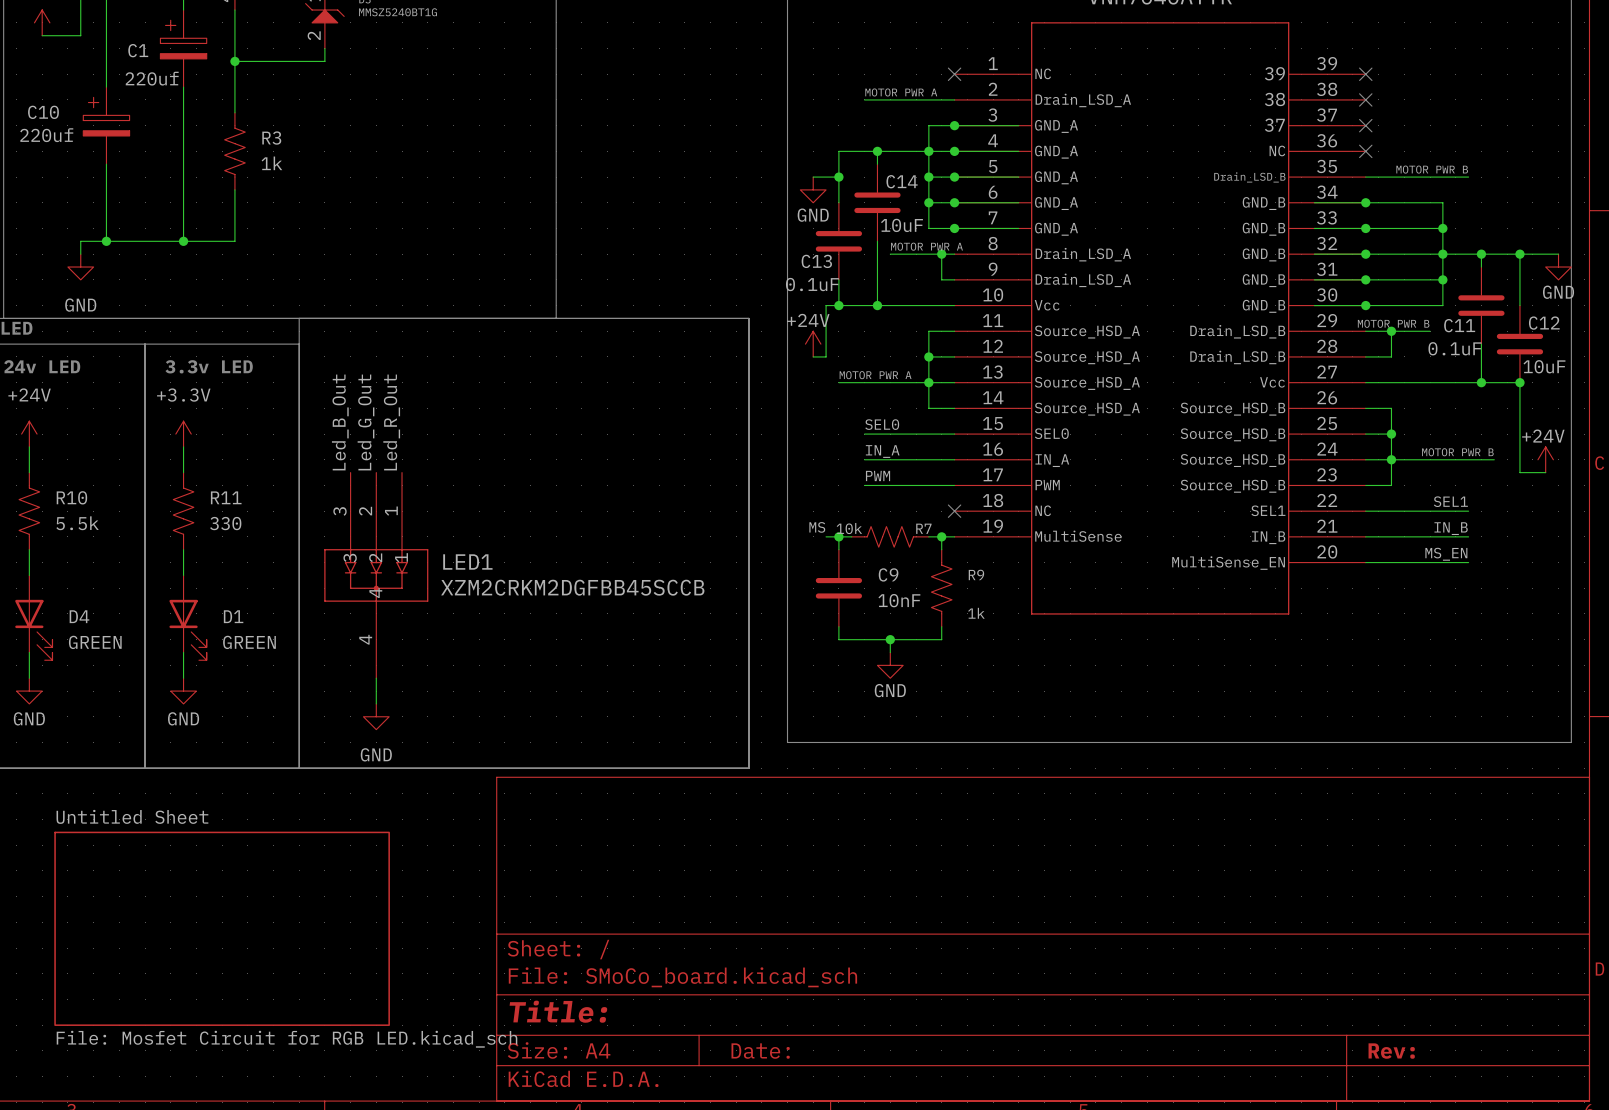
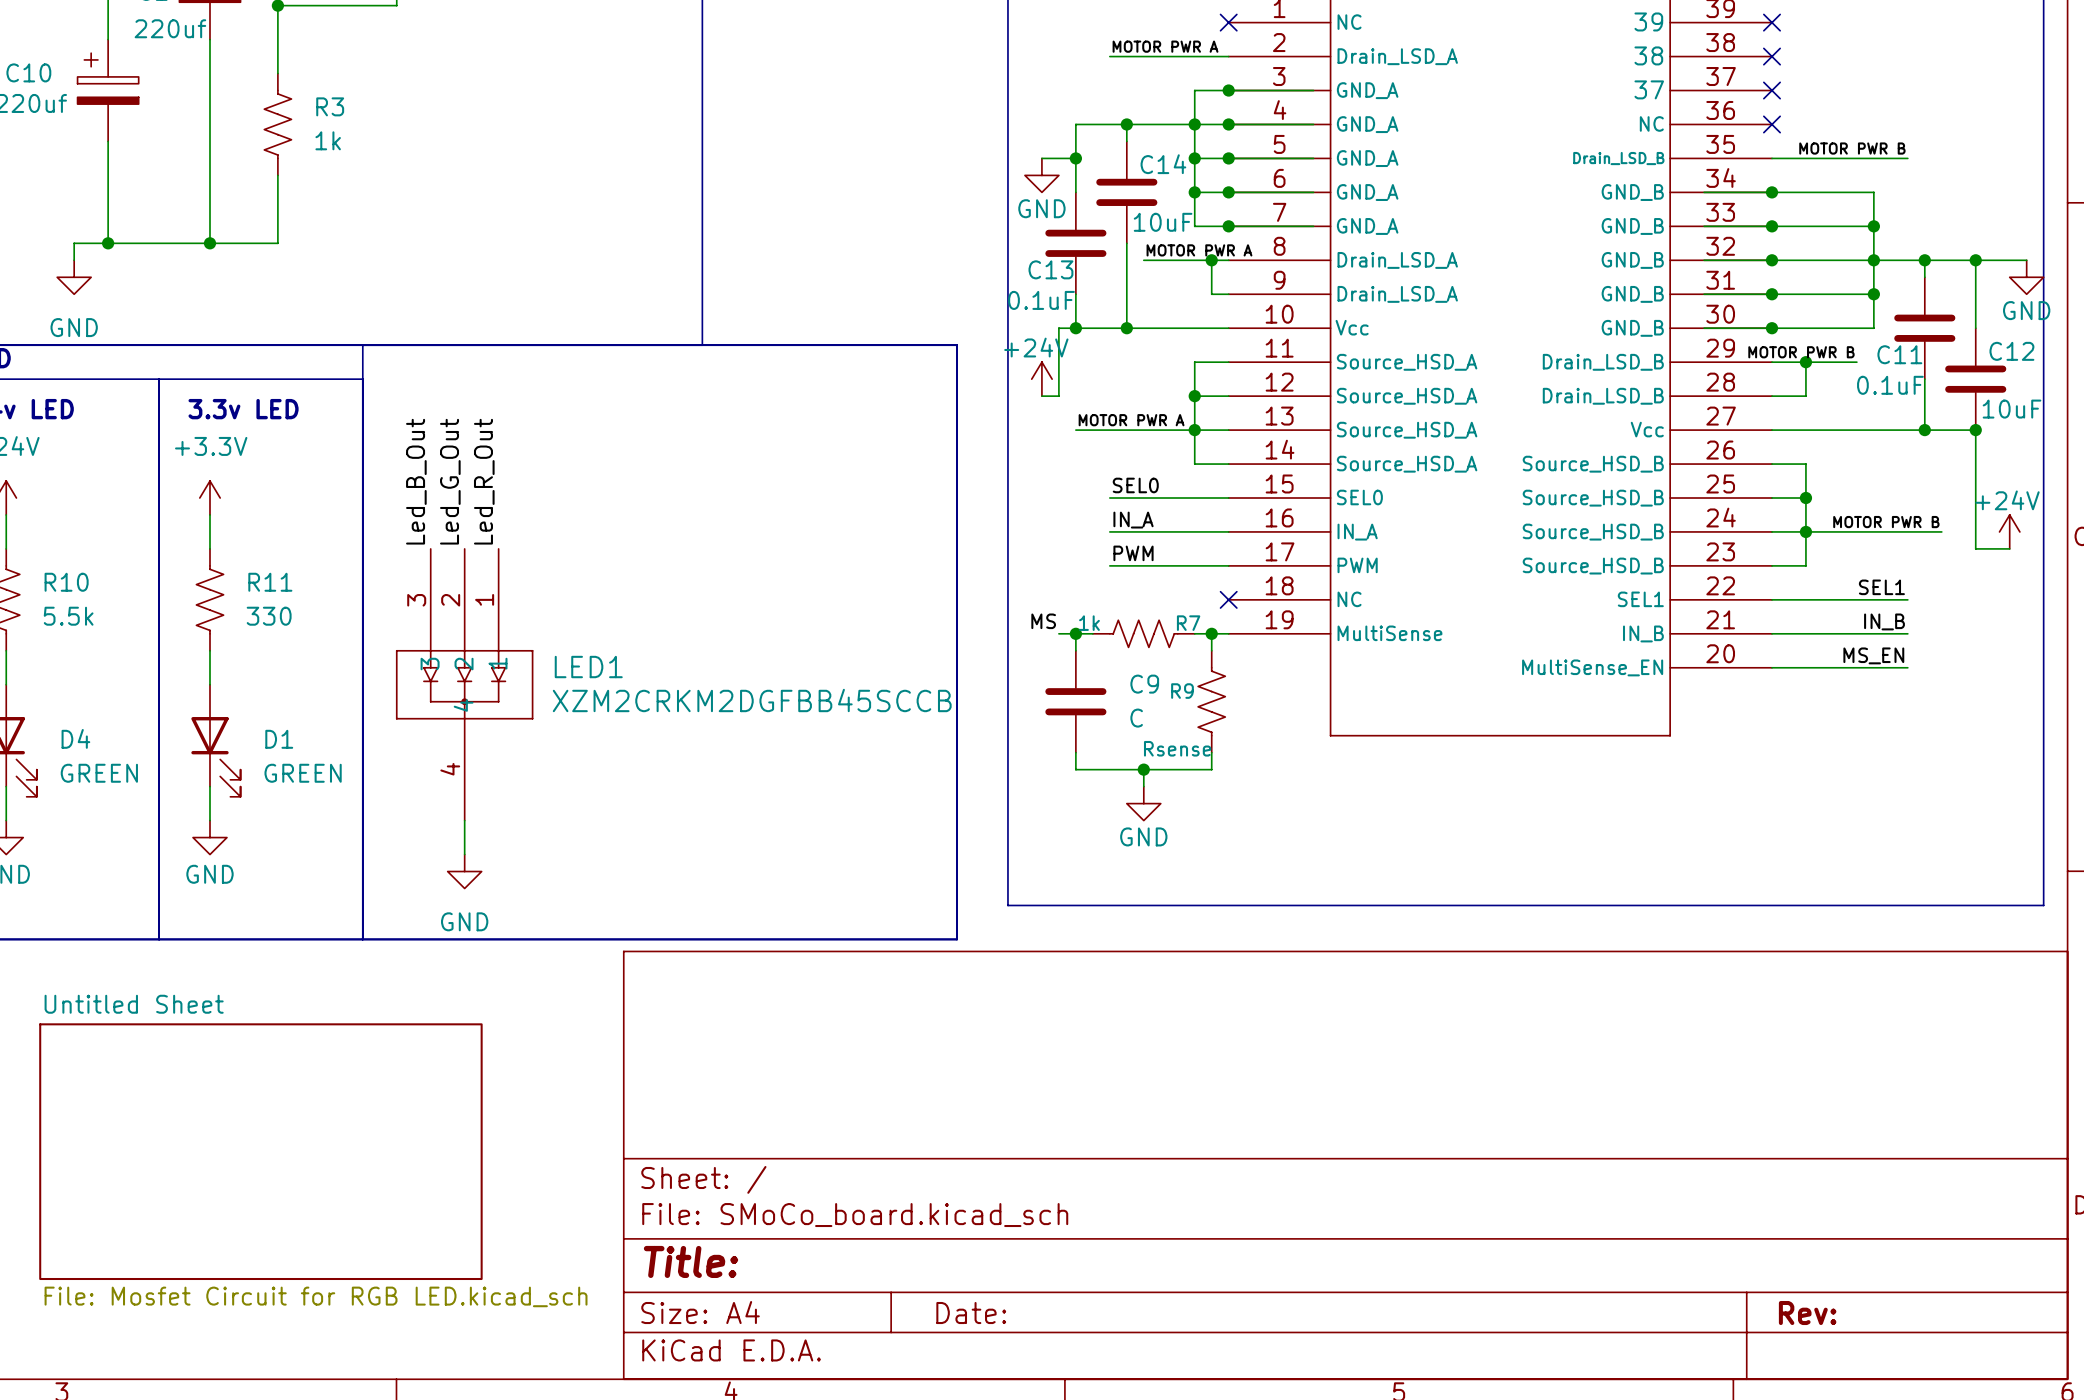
R7 value: 10k (849, 528) -> 1k (1089, 623)
R9 name position: R9 (976, 574) -> R9 (1182, 691)
C9 value: 10nF (899, 600) -> C (1136, 718)
R9 value: 1k (976, 613) -> Rsense (1177, 748)

